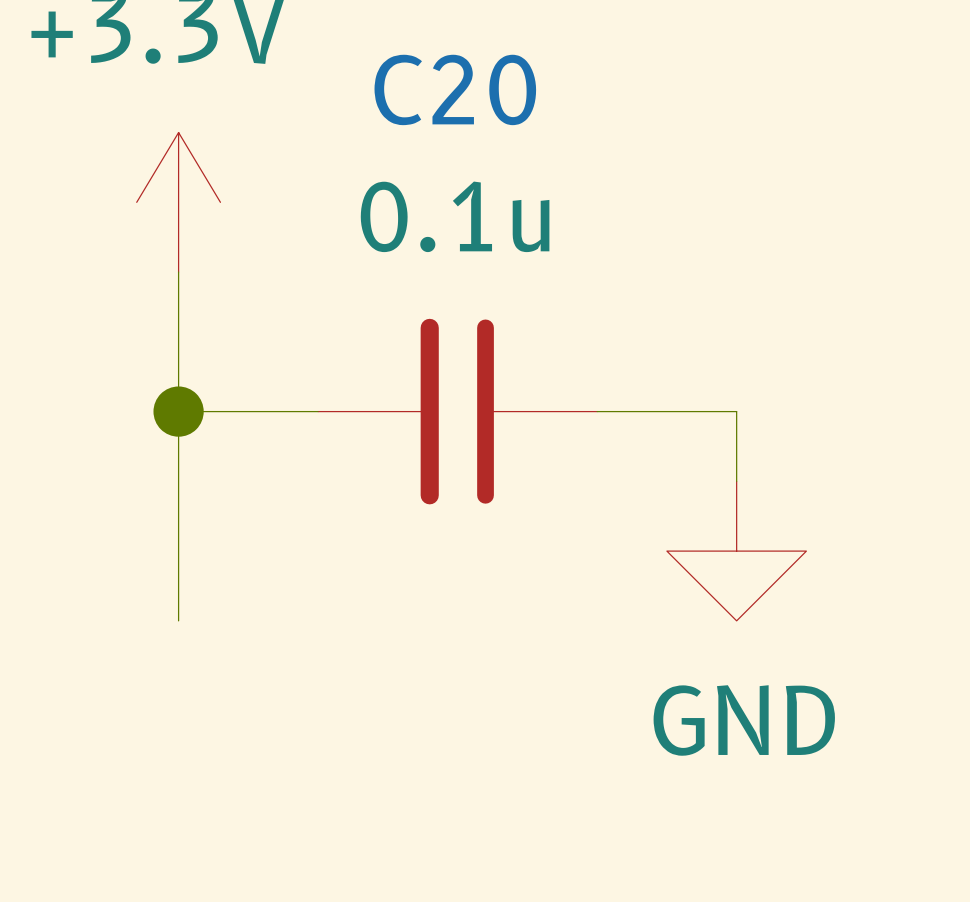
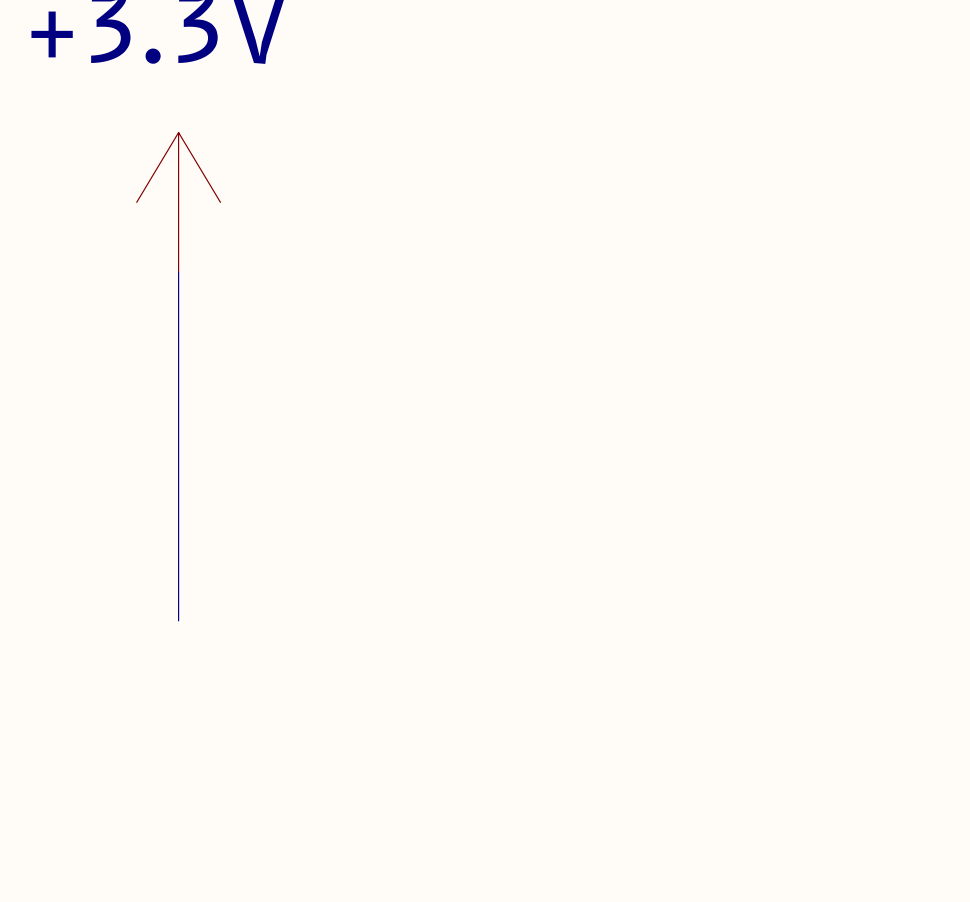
wire: (178, 411) (318, 411) -> none
junction: (178, 411) -> none
C20: 0.1u (457, 411) -> none
wire: (597, 411) (736, 411) (736, 481) -> none
power symbol: GND (736, 551) -> none

